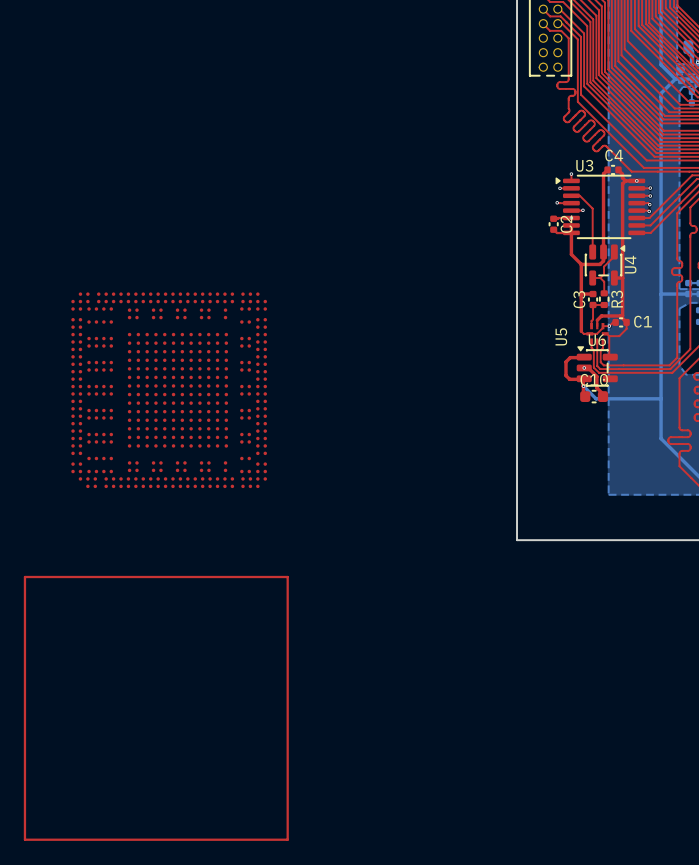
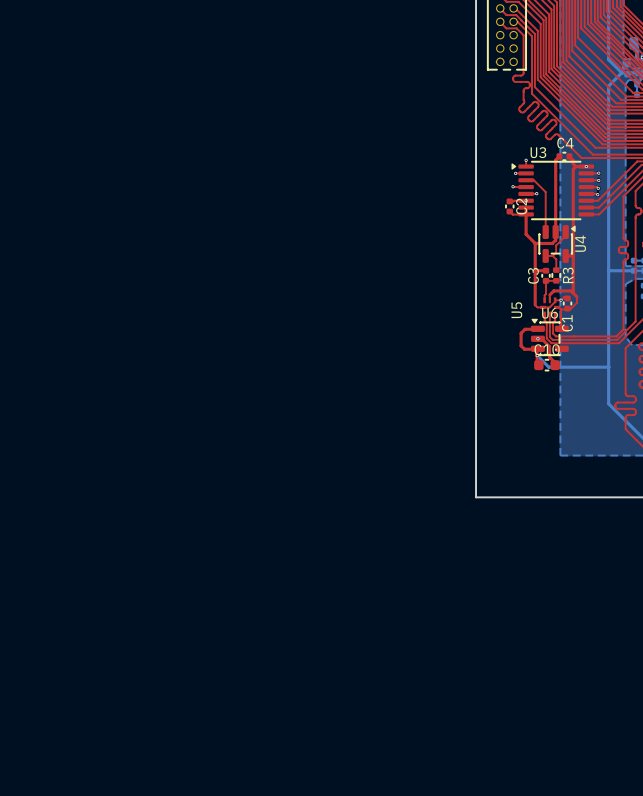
drawing: [71, 292, 267, 489] -> none
C1 rotation: 0° (621, 322) -> 90° clockwise (567, 303)
top track: (24, 577) (287, 577) (287, 839) (24, 839) (24, 577) -> none

